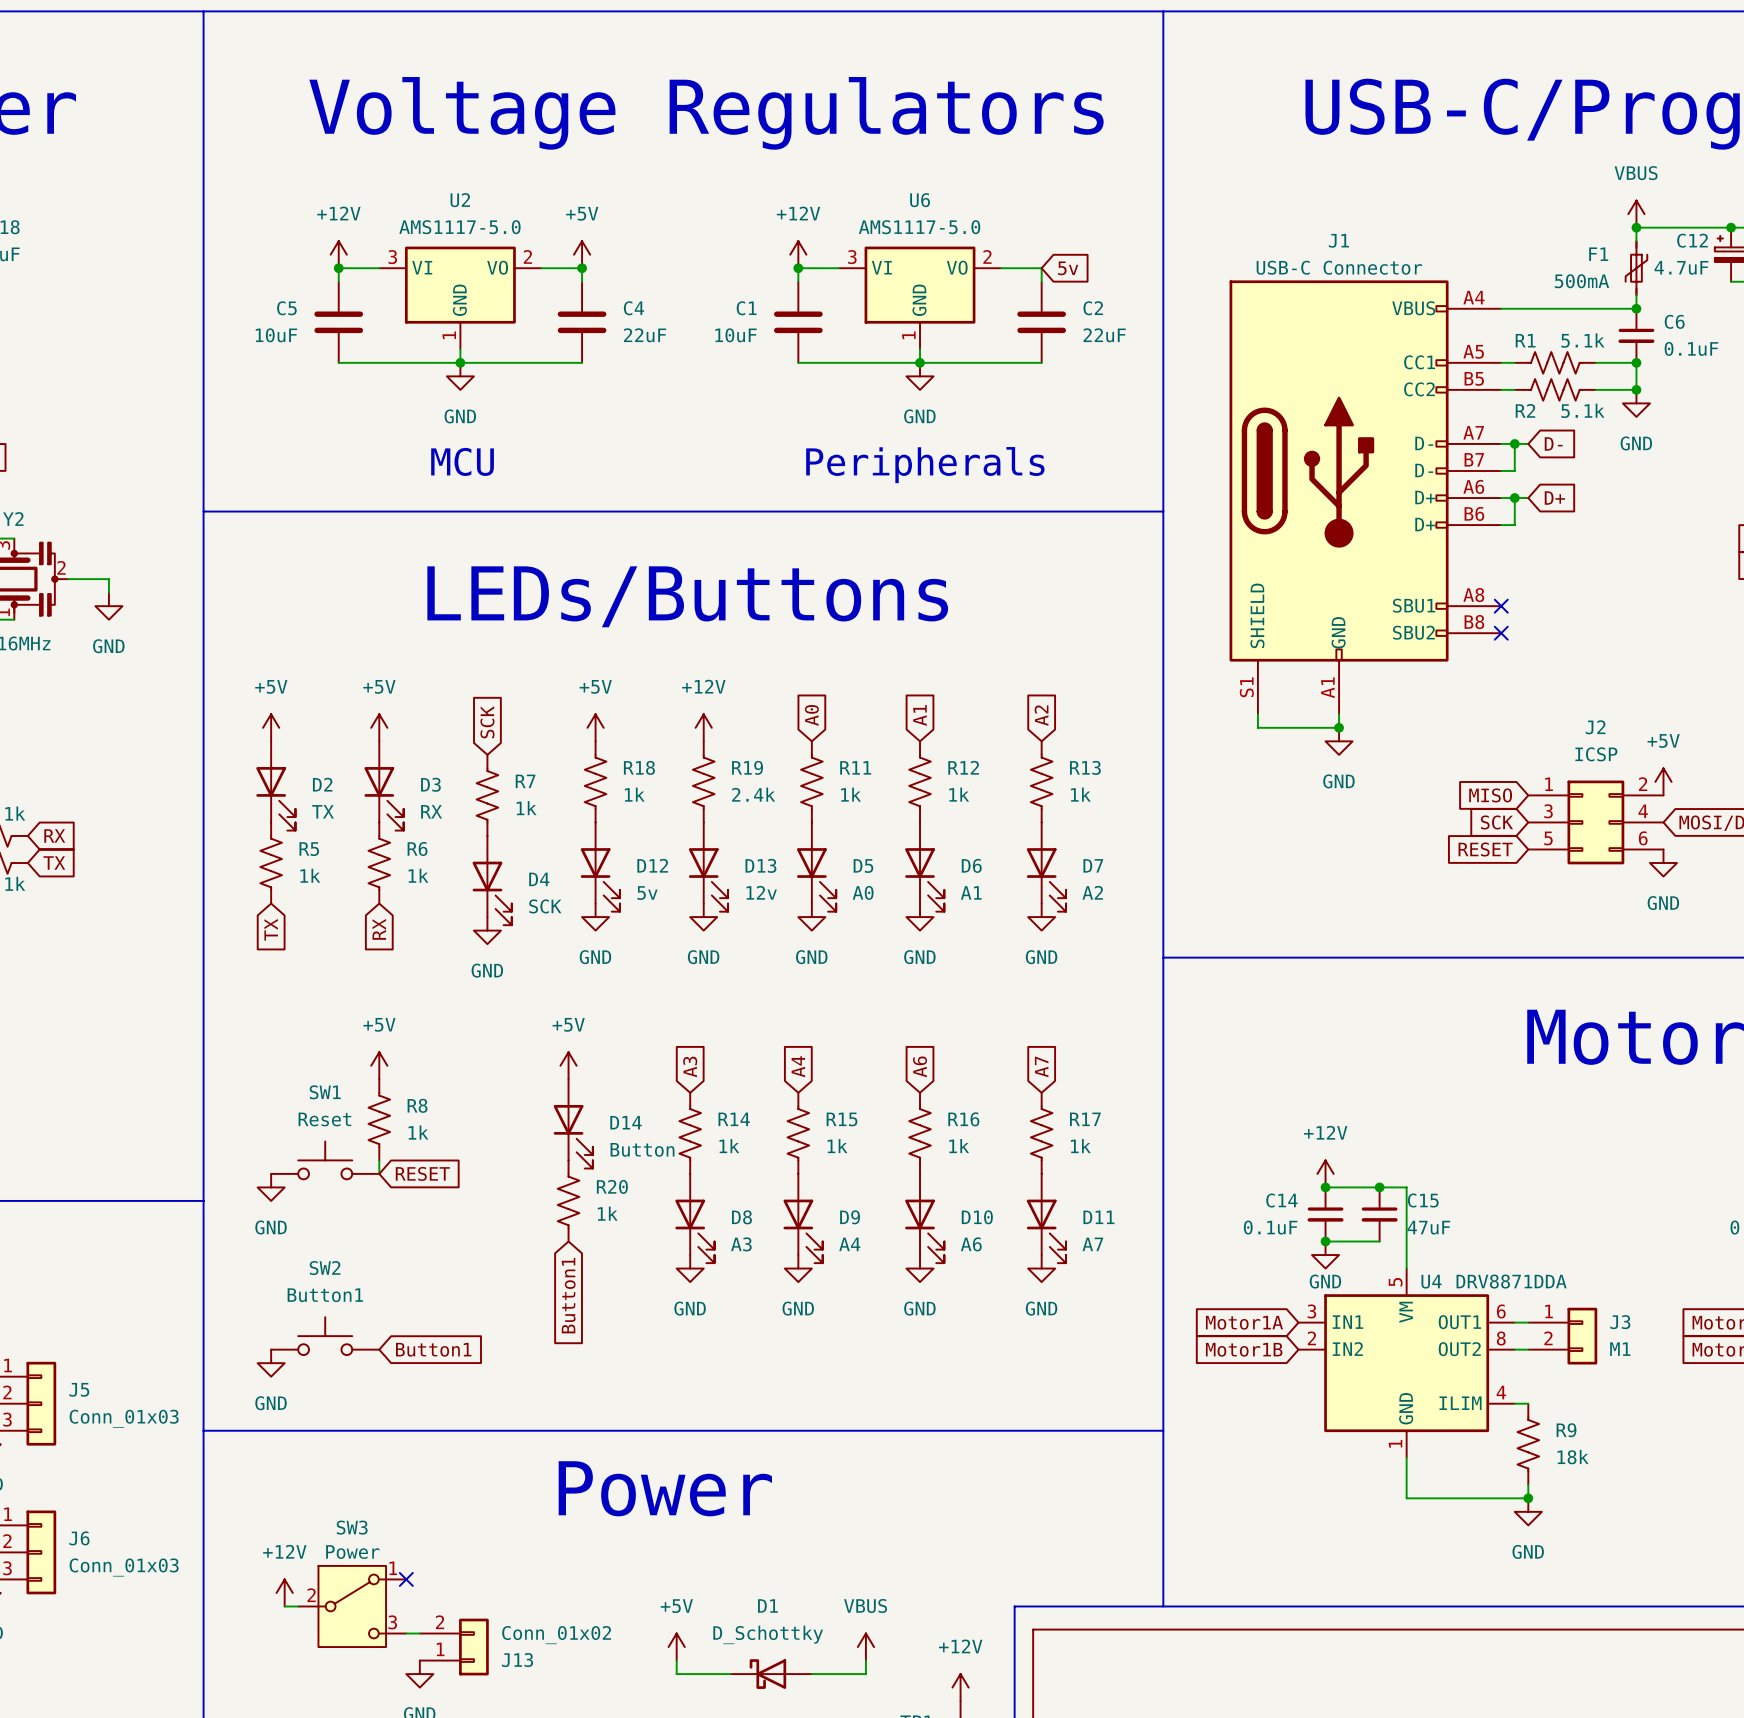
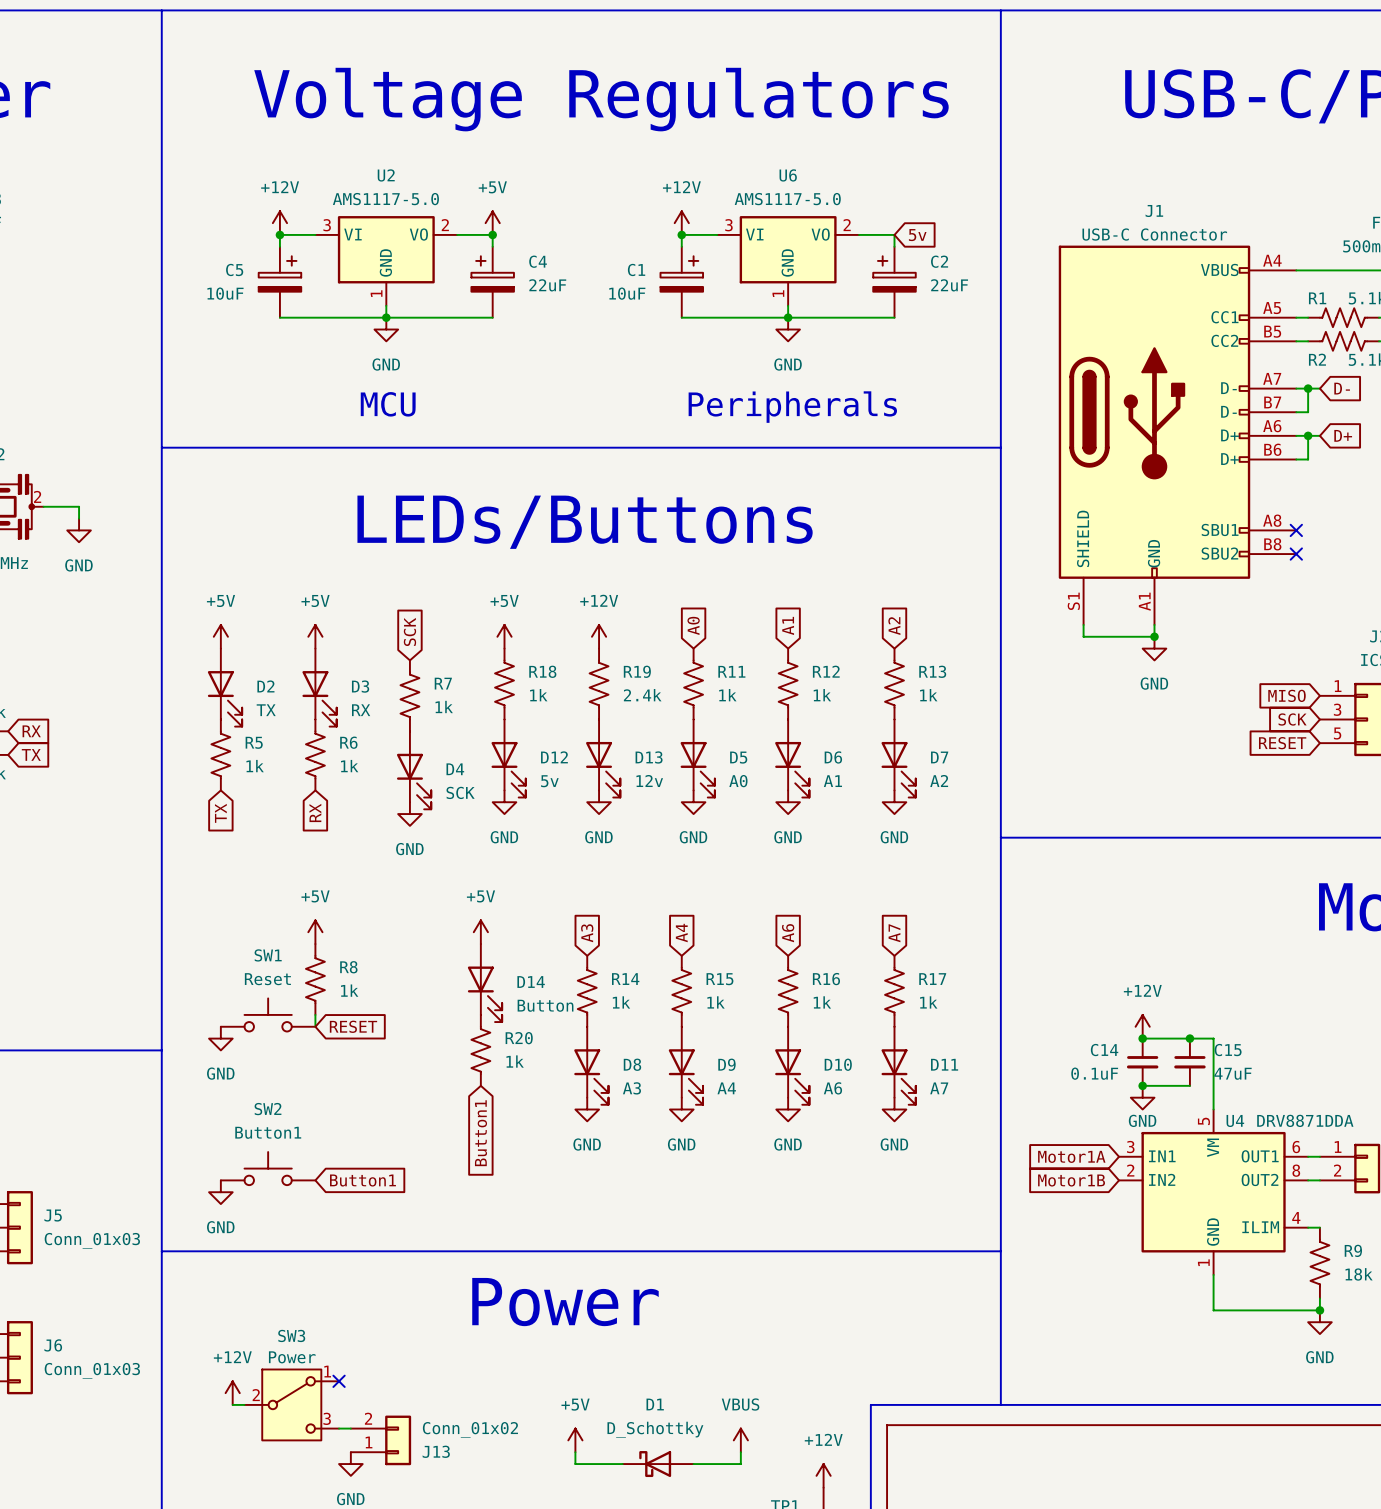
C5 symbol: [314, 281, 364, 363] -> [258, 246, 302, 318]
C4 symbol: [557, 281, 607, 363] -> [471, 246, 514, 318]
C1 symbol: [774, 281, 823, 363] -> [660, 246, 704, 318]
C2 symbol: [1017, 281, 1067, 363] -> [873, 246, 916, 318]

